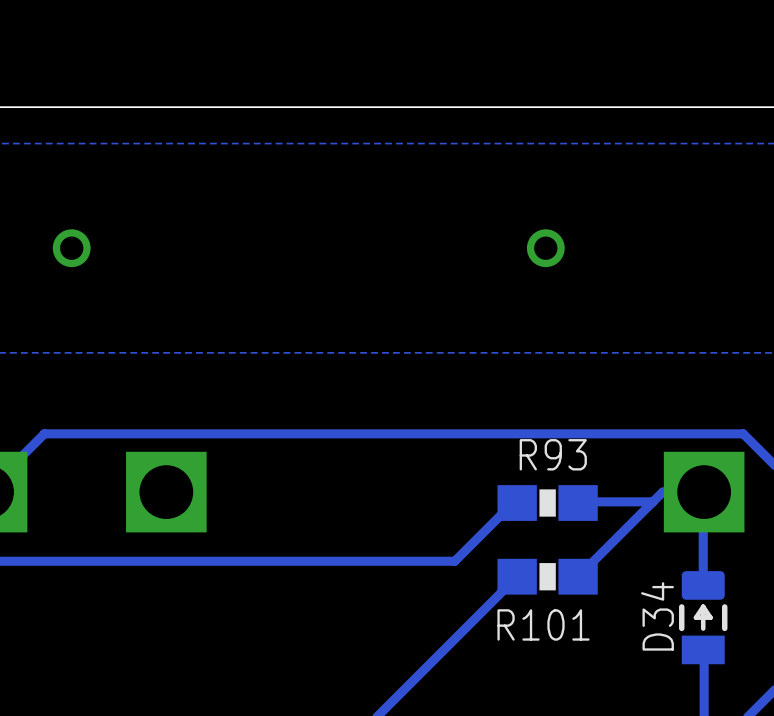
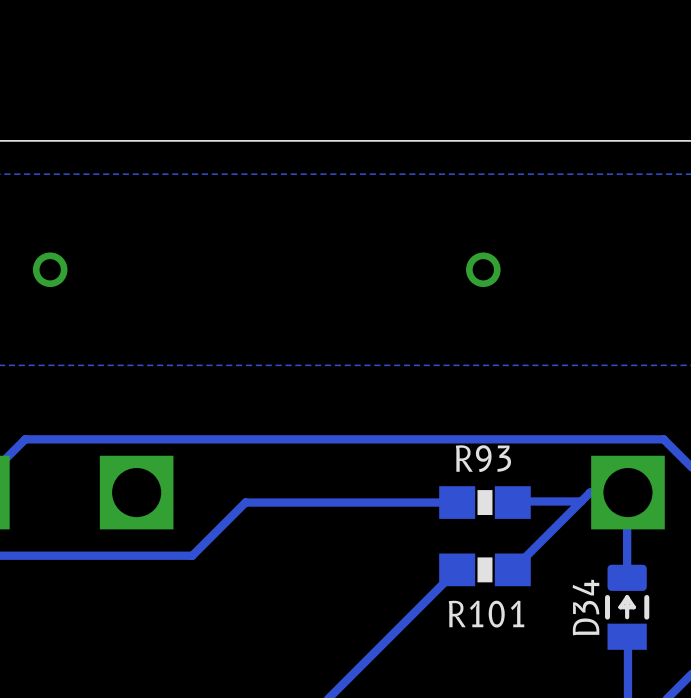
track: (513, 503) (454, 561) (227, 561) -> (453, 502) (245, 502) (192, 555)

